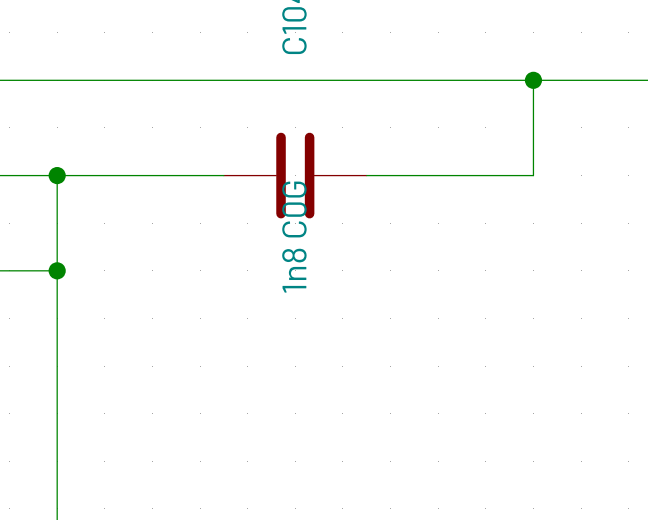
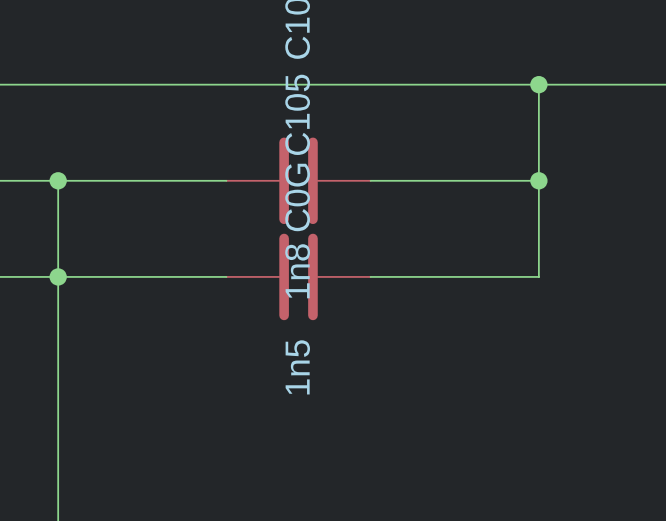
wire: none -> (538, 180) (538, 276) (370, 276)
junction: none -> (538, 180)
wire: none -> (58, 276) (226, 276)
C105: none -> 1n5 (298, 276)

